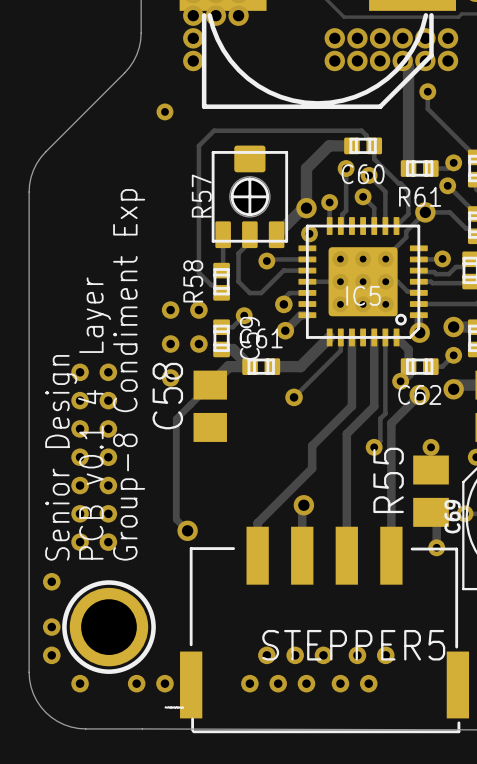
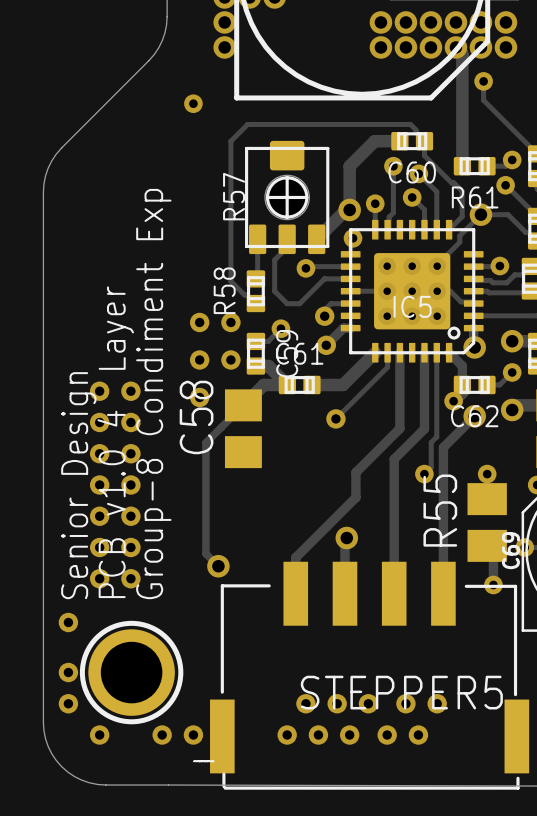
text: PCB v0.1 4 Layer (94, 418) -> PCB v1.0 4 Layer (115, 442)

